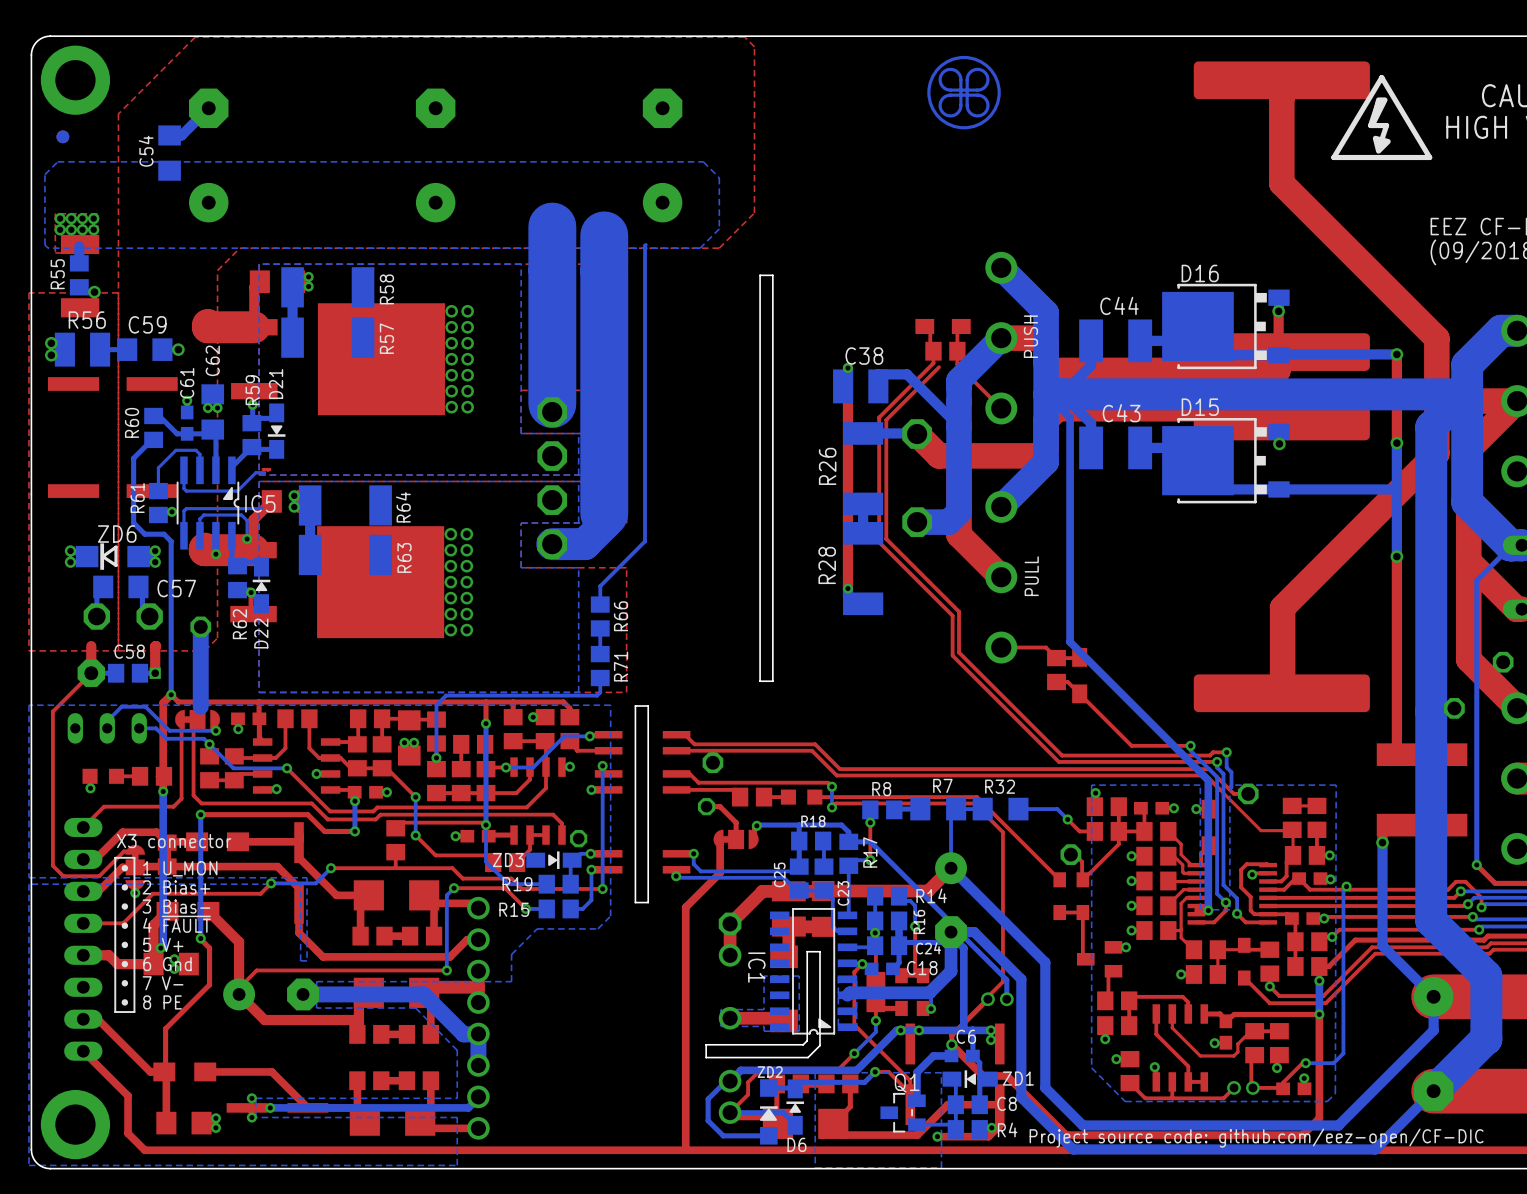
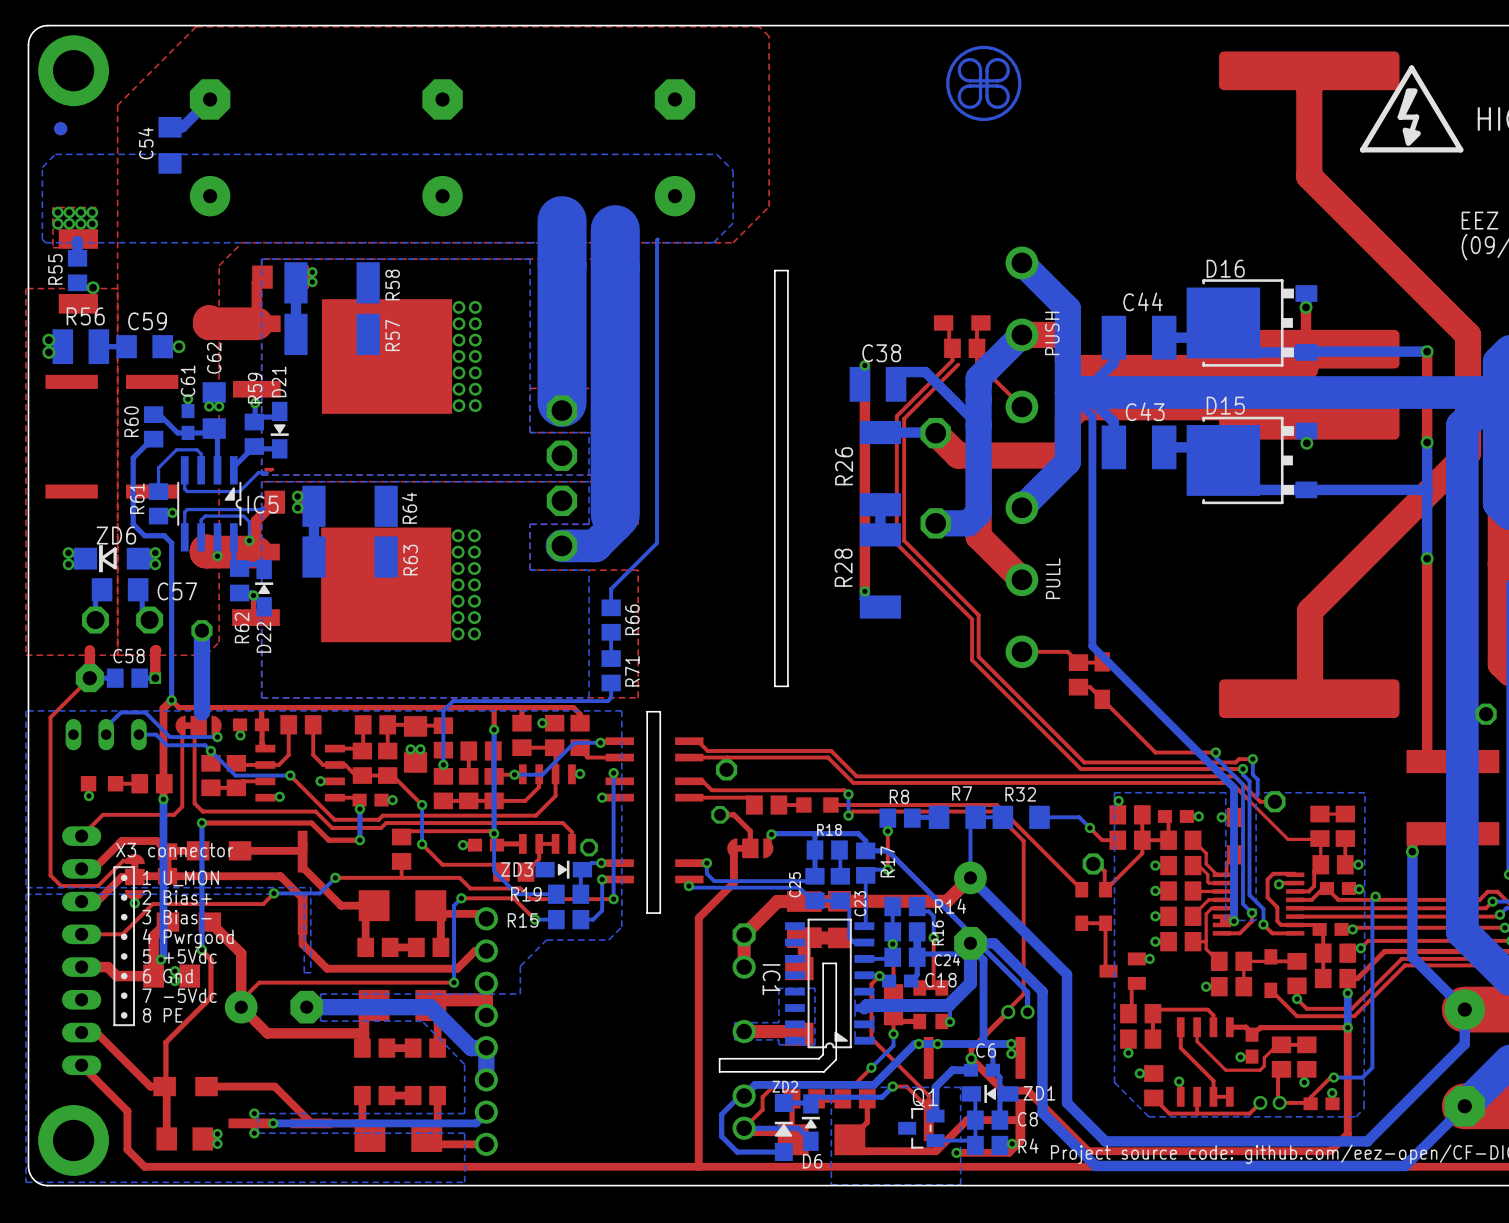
text: 4 ~{FAULT} (177, 924) -> 4 Pwrgood (188, 938)
text: 5 V+ (163, 944) -> 5 +5Vdc (179, 956)
text: 7 V- (163, 983) -> 7 -5Vdc (179, 995)

